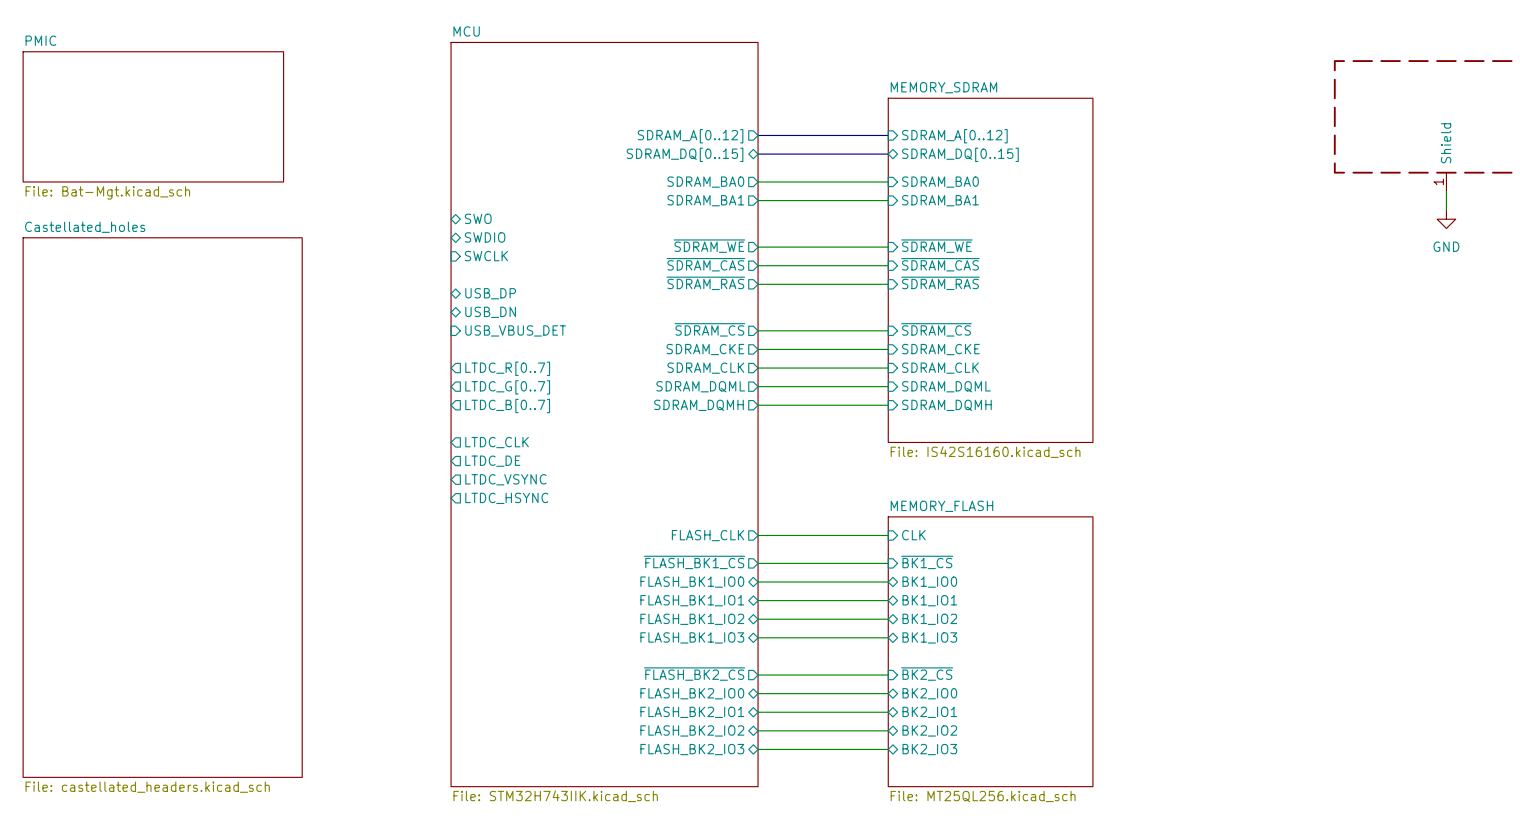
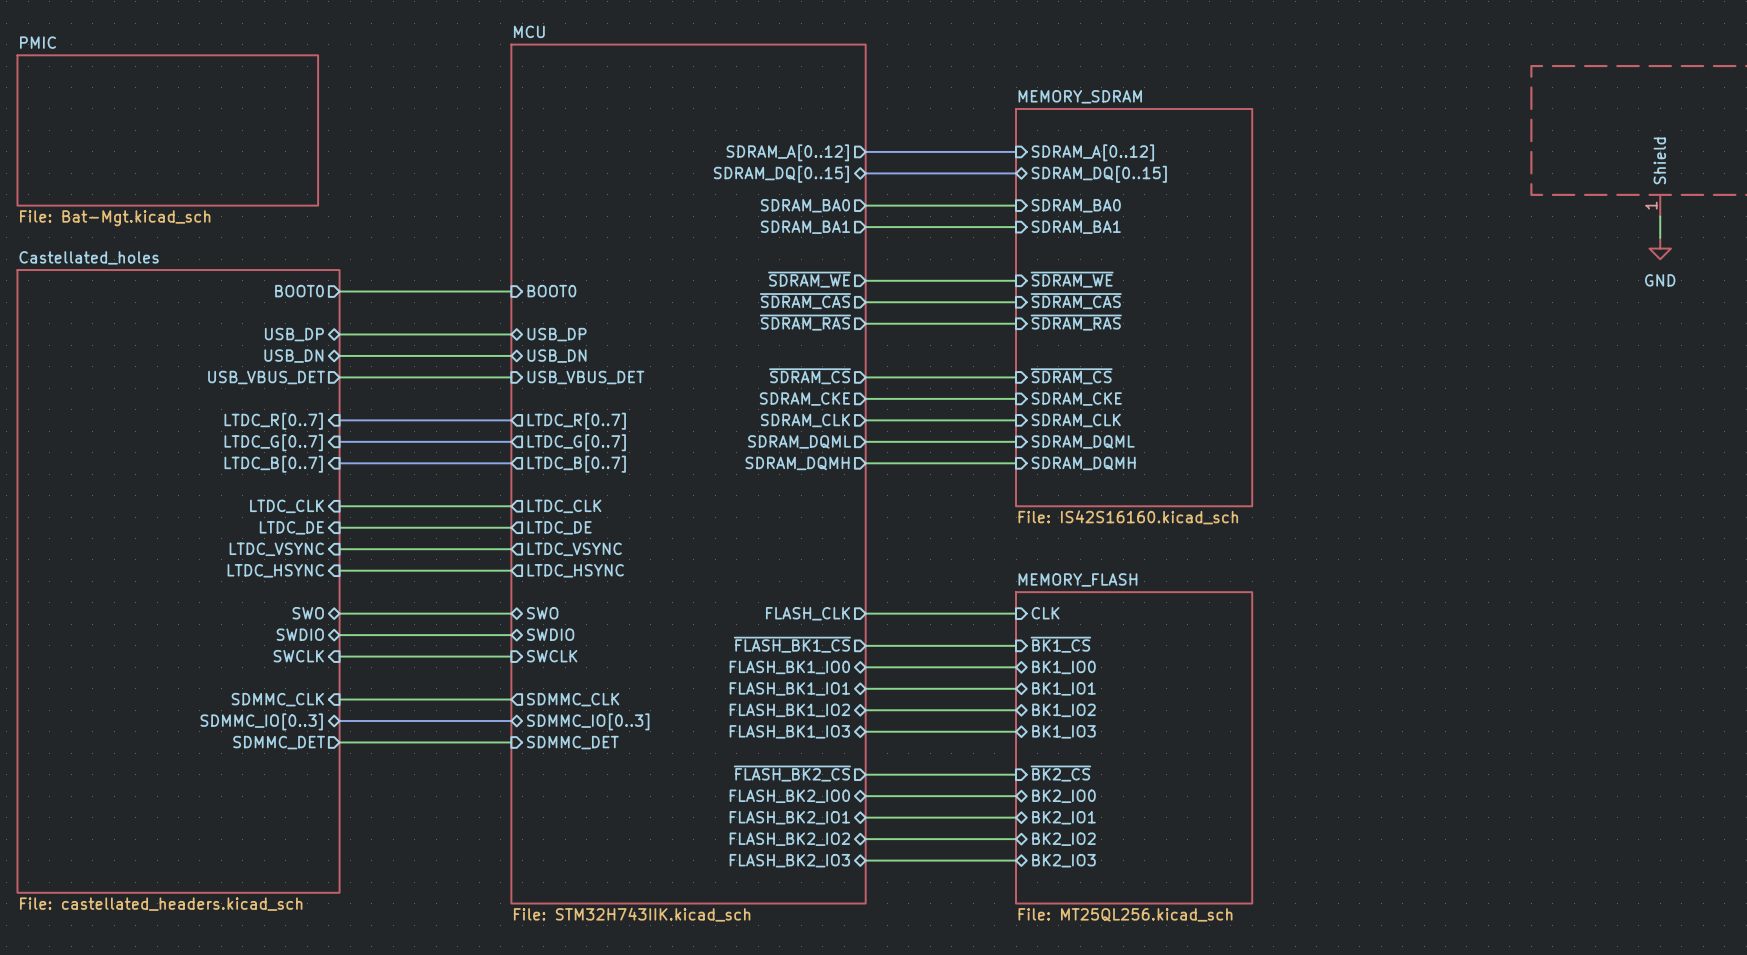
sheet pin: SWO (478, 218) -> none
sheet pin: SWDIO (485, 237) -> none
sheet pin: none -> BOOT0 (299, 291)
wire: none -> (339, 291) (511, 291)
sheet pin: SWCLK (486, 256) -> BOOT0 (551, 291)
sheet pin: none -> USB_DP (294, 334)
wire: none -> (339, 334) (511, 334)
sheet pin: none -> USB_DN (293, 356)
wire: none -> (339, 355) (511, 355)
sheet pin: none -> USB_VBUS_DET (266, 377)
wire: none -> (339, 377) (511, 377)
sheet pin: none -> LTDC_R[0..7] (273, 421)
bus: none -> (339, 420) (511, 420)
bus: none -> (339, 441) (511, 441)
sheet pin: none -> LTDC_G[0..7] (273, 442)
bus: none -> (339, 463) (511, 463)
sheet pin: none -> LTDC_B[0..7] (273, 464)
sheet pin: none -> LTDC_CLK (287, 506)
wire: none -> (339, 506) (511, 506)
sheet pin: none -> LTDC_DE (291, 527)
wire: none -> (339, 527) (511, 527)
sheet pin: none -> LTDC_VSYNC (276, 549)
wire: none -> (339, 549) (511, 549)
sheet pin: none -> LTDC_HSYNC (275, 570)
wire: none -> (339, 570) (511, 570)
sheet pin: none -> SWO (308, 613)
wire: none -> (339, 613) (511, 613)
sheet pin: none -> SWO (542, 613)
sheet pin: none -> SWDIO (300, 634)
sheet pin: none -> SWDIO (550, 634)
wire: none -> (339, 635) (511, 635)
sheet pin: none -> SWCLK (298, 656)
wire: none -> (339, 656) (511, 656)
sheet pin: none -> SWCLK (552, 656)
wire: none -> (339, 699) (511, 699)
sheet pin: none -> SDMMC_CLK (277, 699)
sheet pin: none -> SDMMC_CLK (573, 699)
bus: none -> (339, 721) (511, 721)
sheet pin: none -> SDMMC_IO[0..3] (261, 721)
sheet pin: none -> SDMMC_IO[0..3] (588, 721)
sheet pin: none -> SDMMC_DET (279, 742)
wire: none -> (339, 742) (511, 742)
sheet pin: none -> SDMMC_DET (572, 742)

